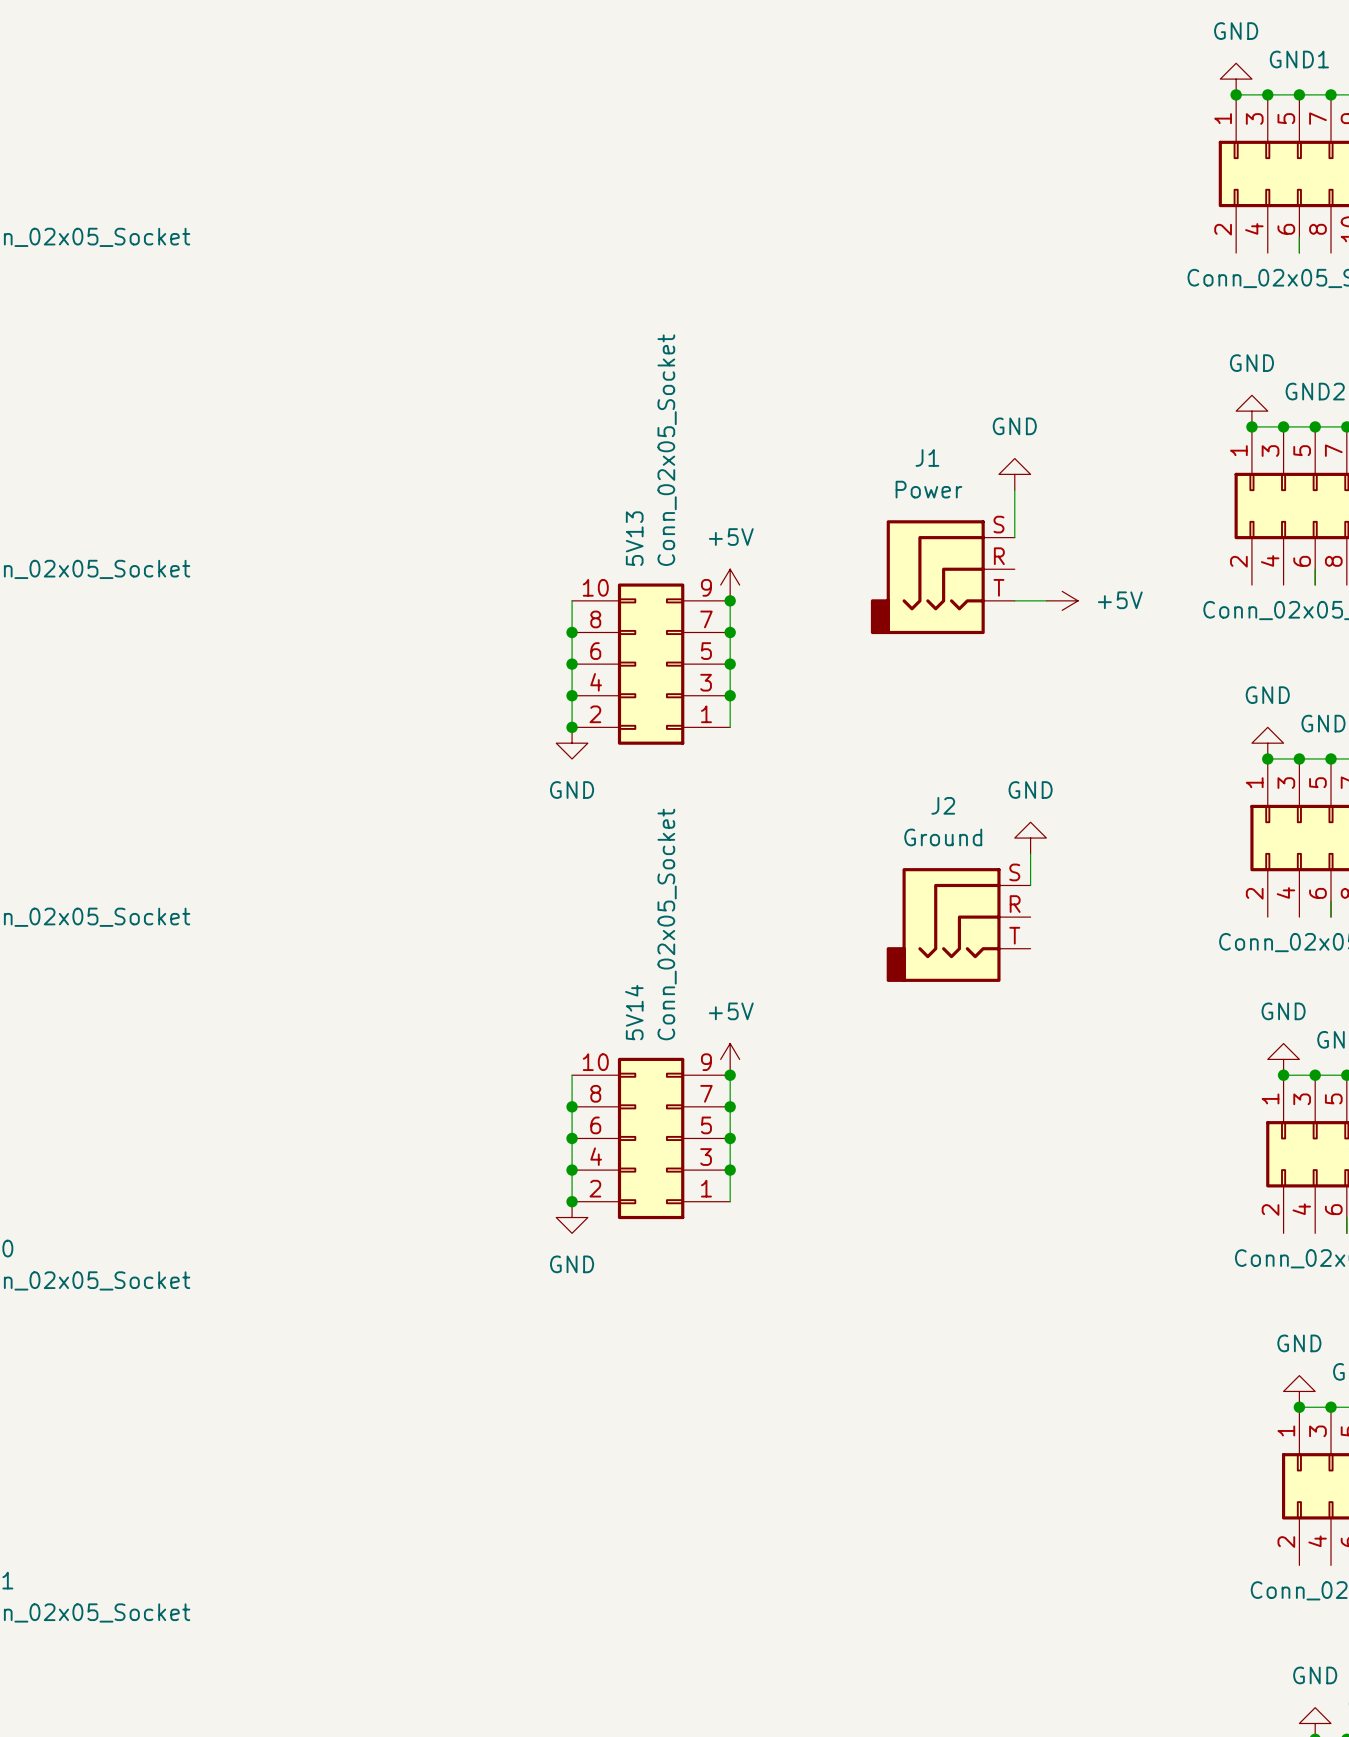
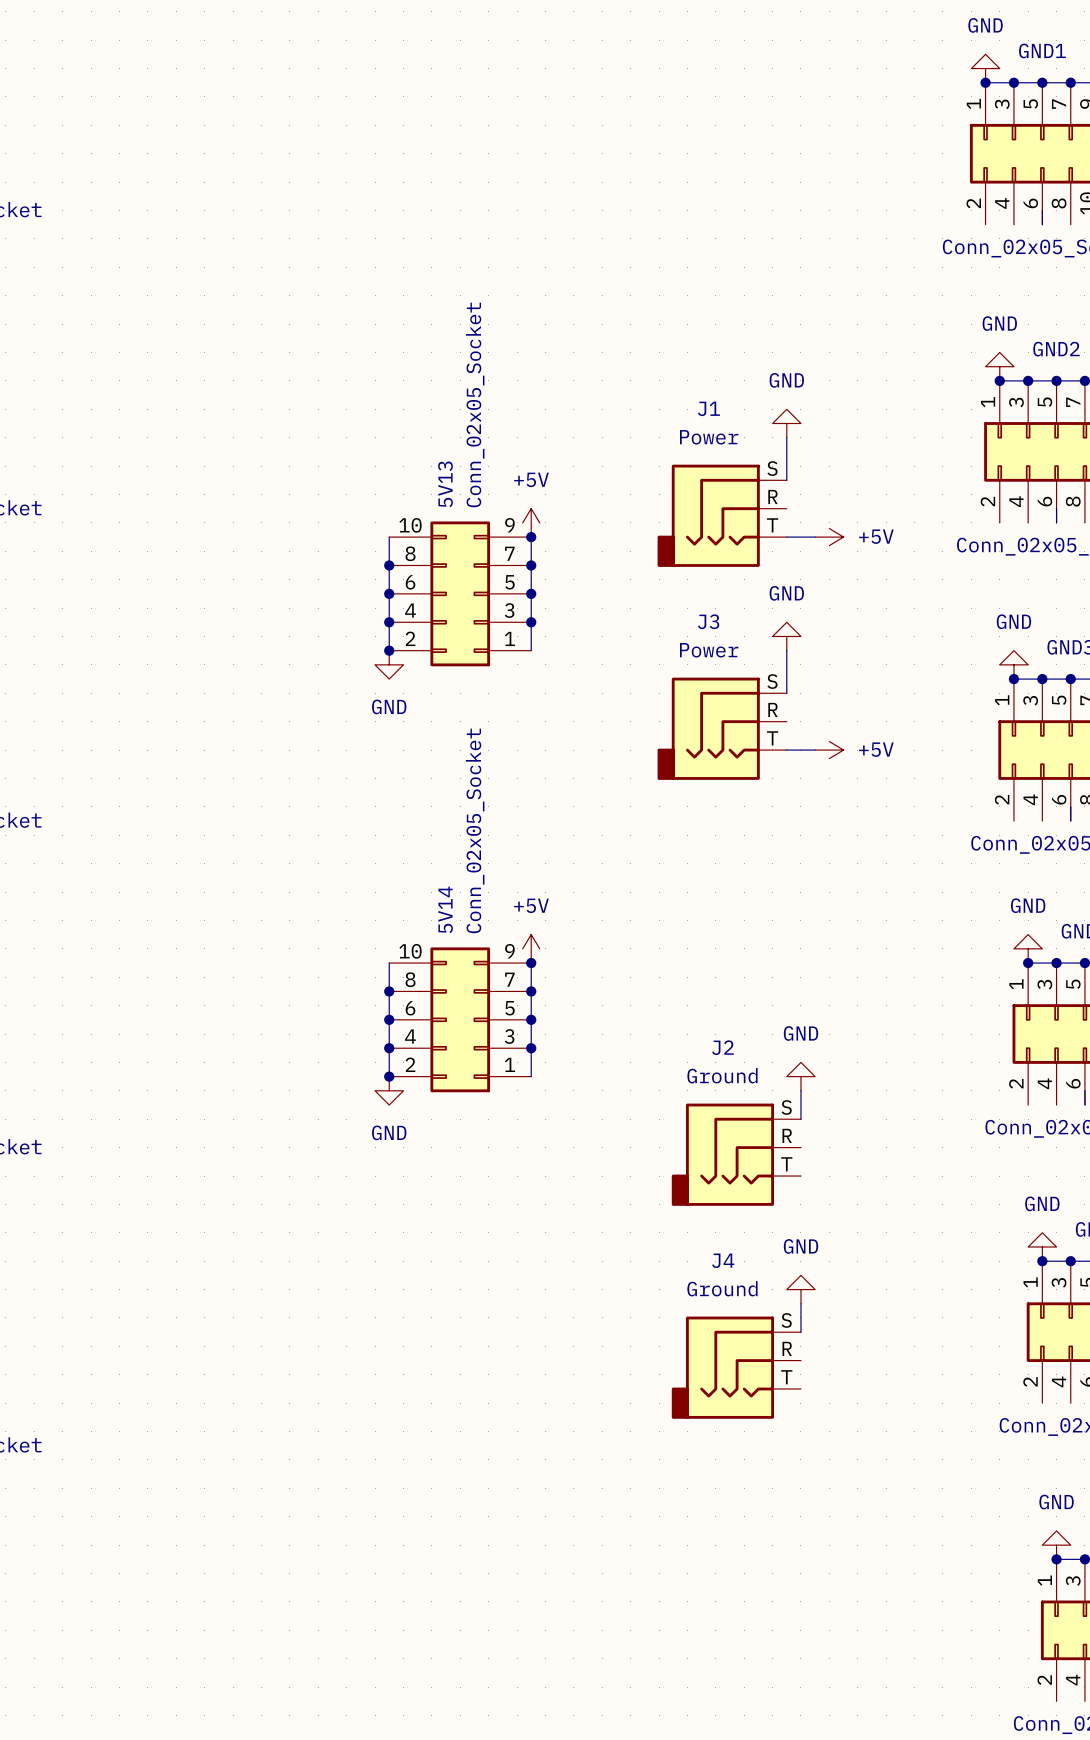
wire: none -> (786, 650) (786, 693)
J3: none -> Power (722, 728)
power symbol position: GND (1030, 838) -> GND (786, 636)
power symbol: none -> +5V (829, 750)
wire: (1030, 853) (1030, 885) -> none
J2 position: (958, 925) -> (736, 1154)
power symbol: none -> GND (800, 1076)
wire: none -> (800, 1090) (800, 1119)
power symbol: none -> GND (800, 1289)
wire: none -> (800, 1303) (800, 1332)
J4: none -> Ground (736, 1367)

